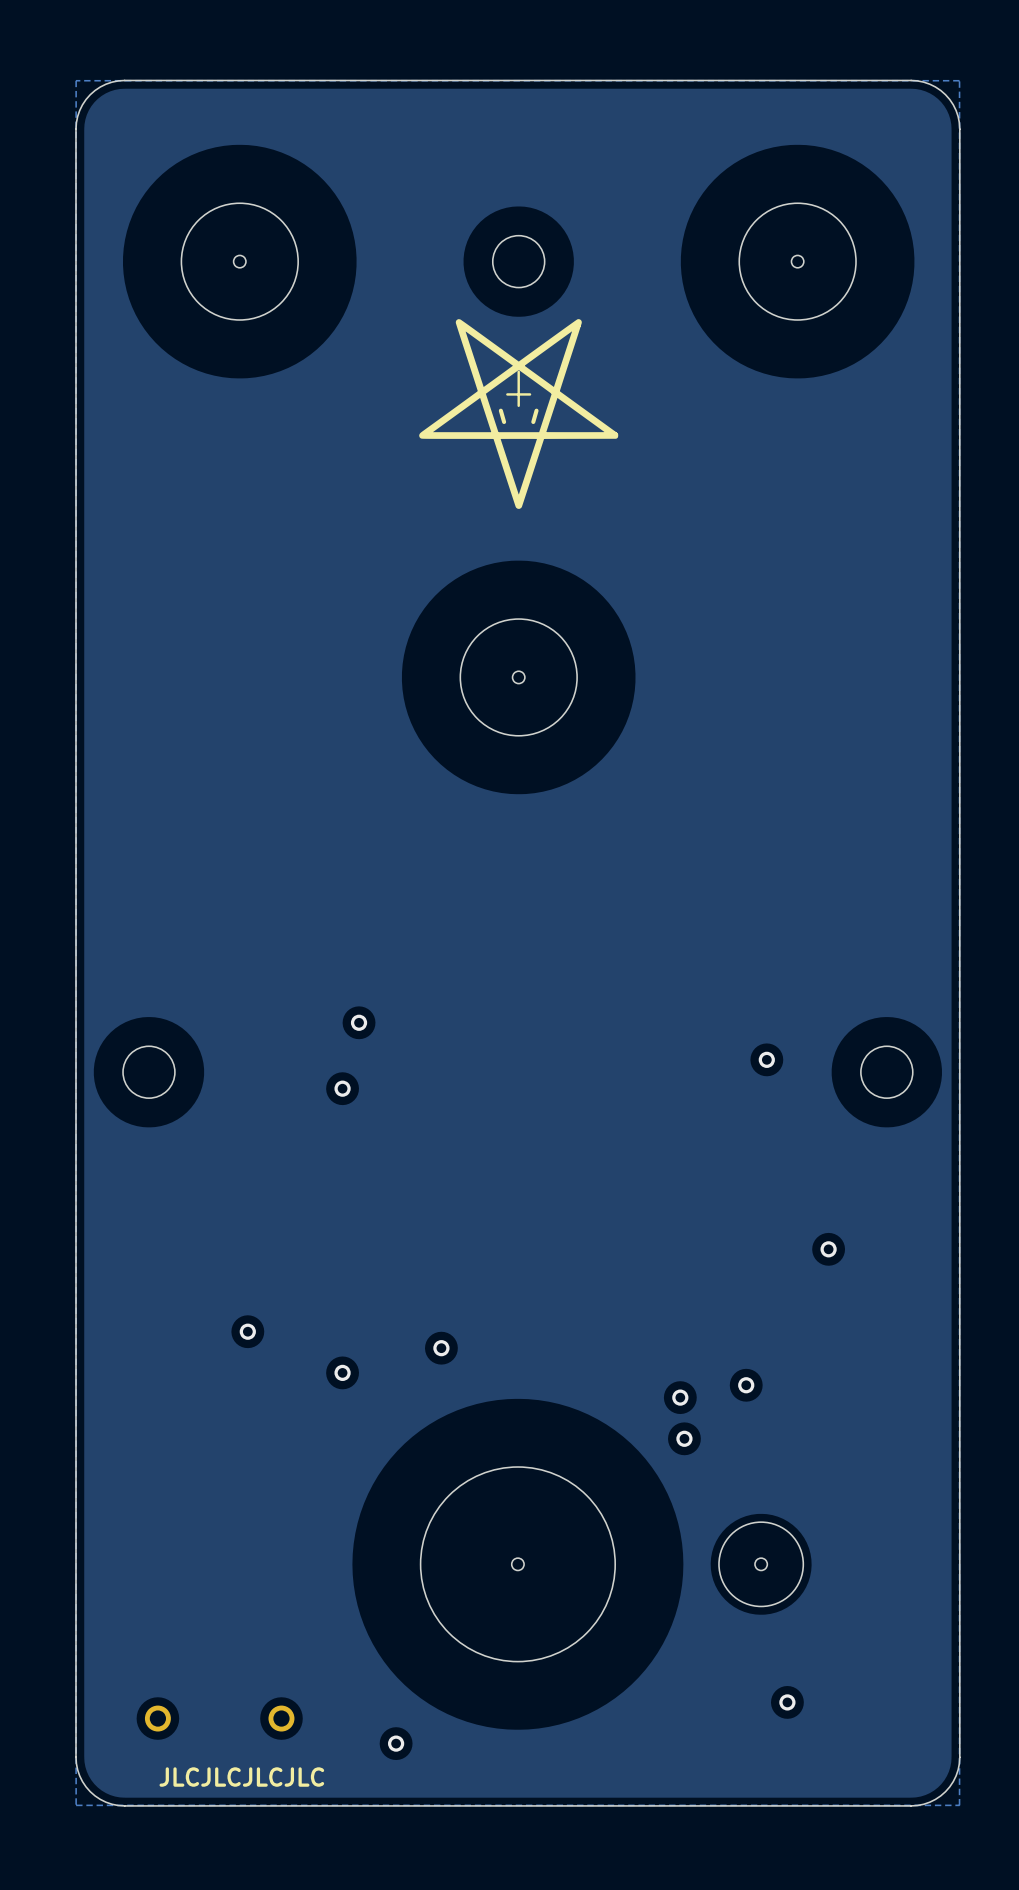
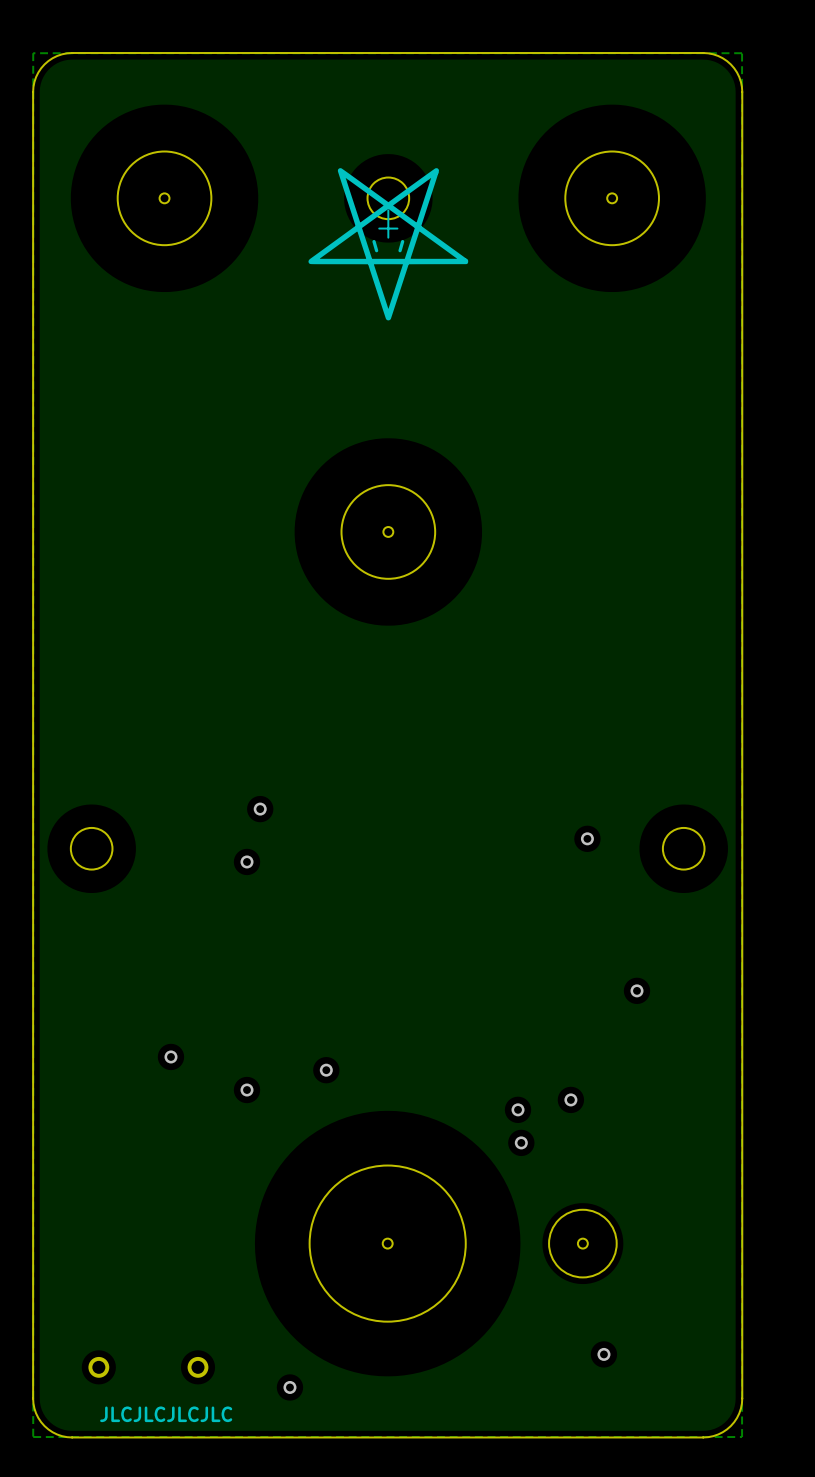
drawing position: (518, 414) -> (388, 244)

